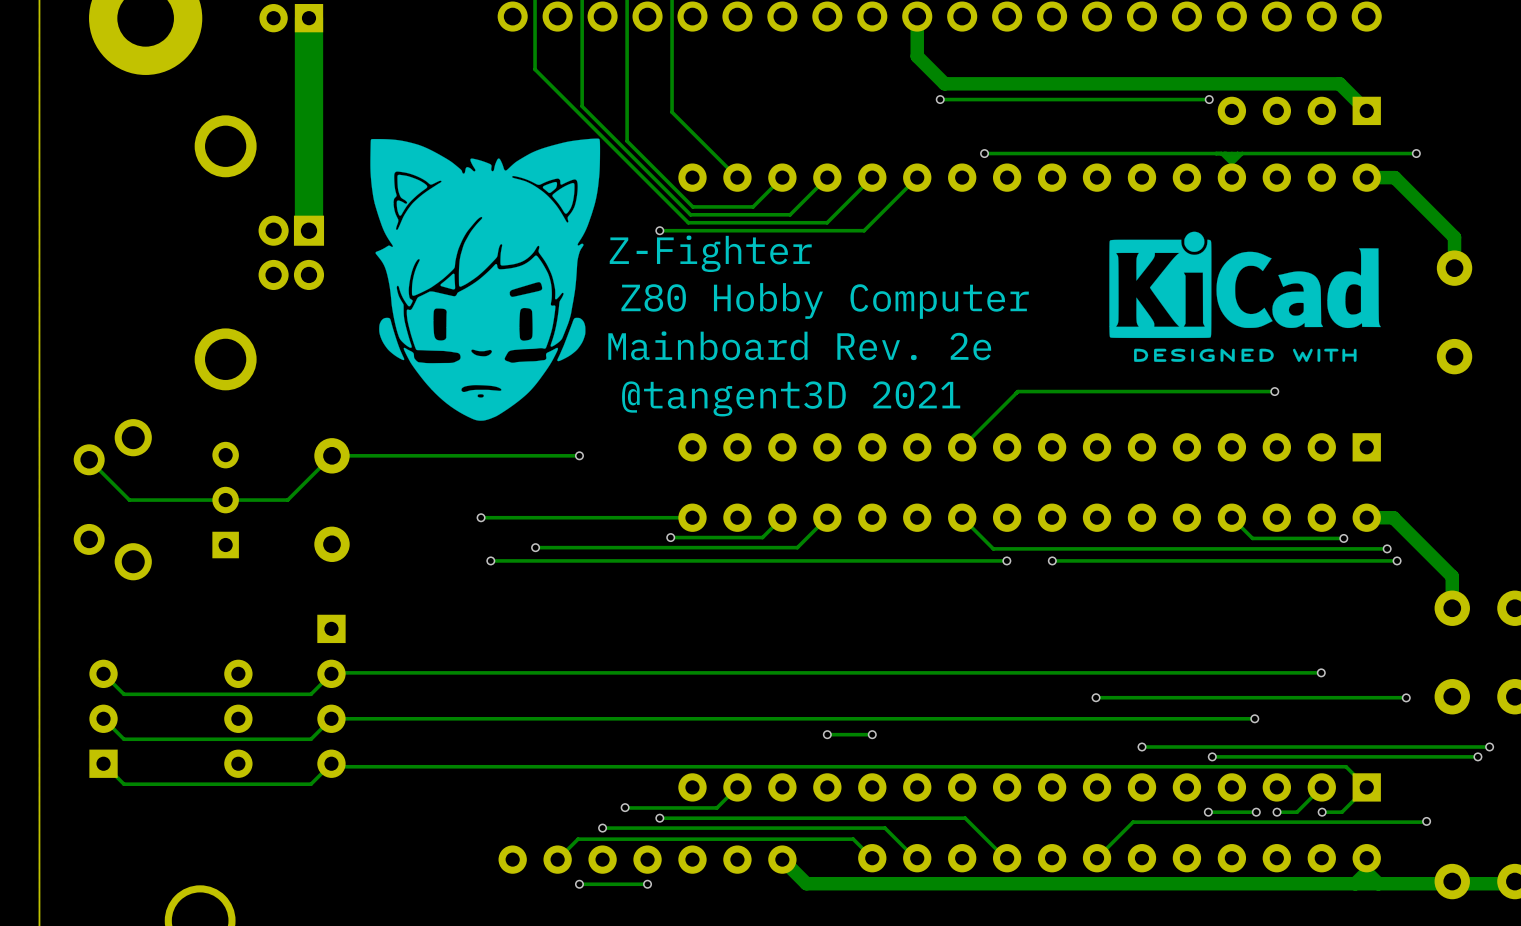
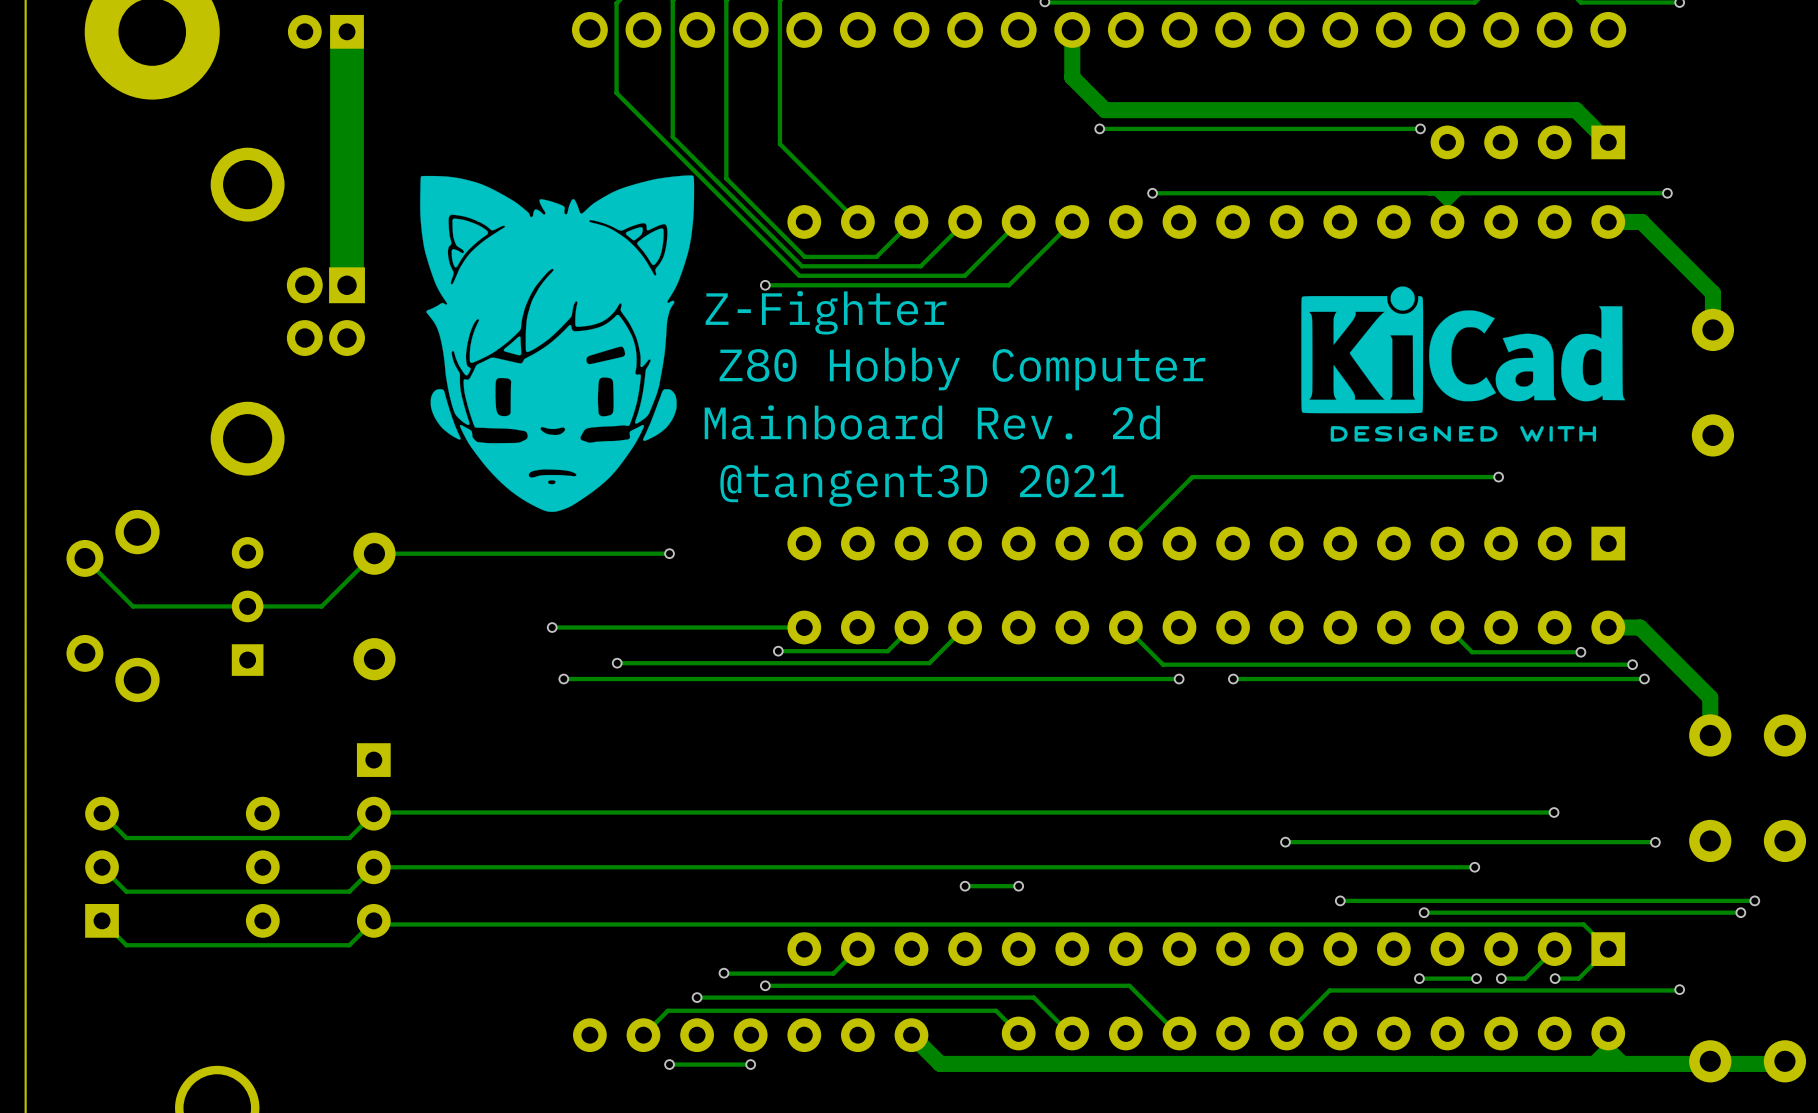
text: Mainboard Rev. 2e (799, 345) -> Mainboard Rev. 2d (932, 422)

